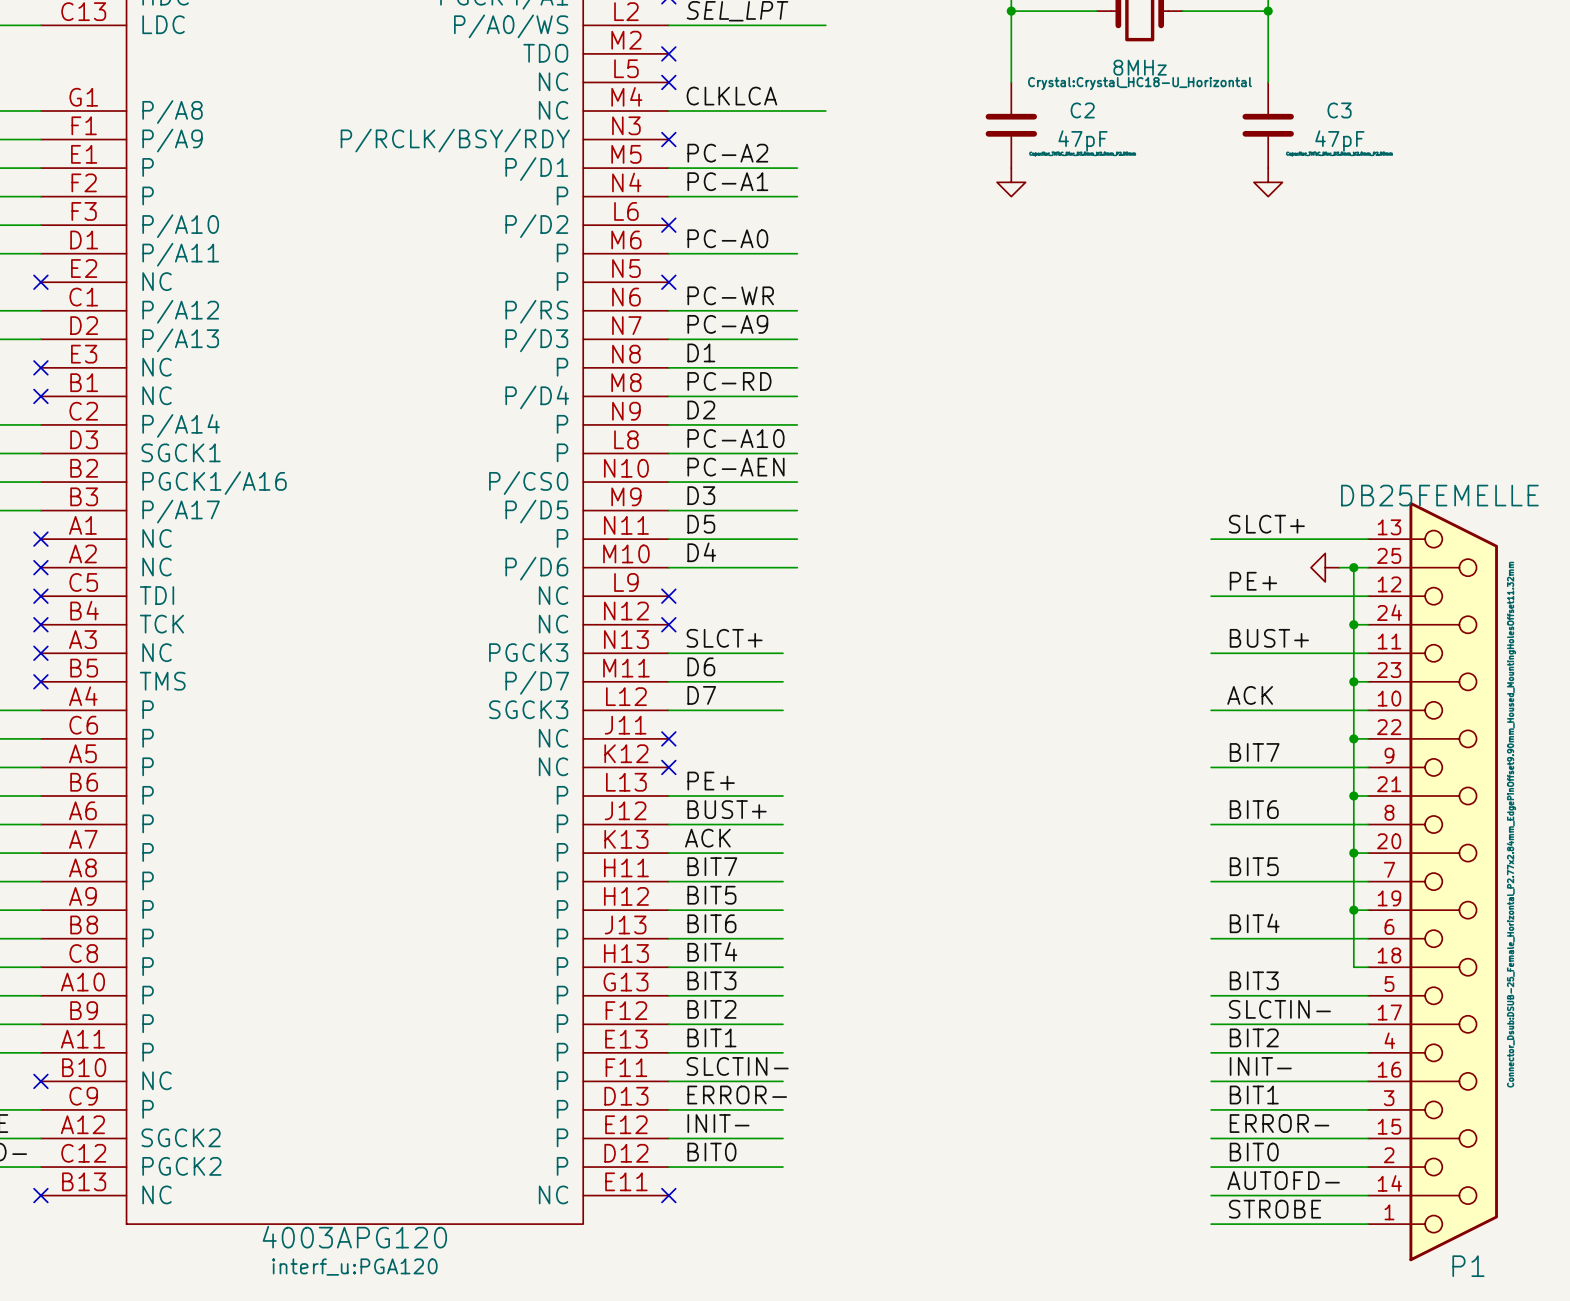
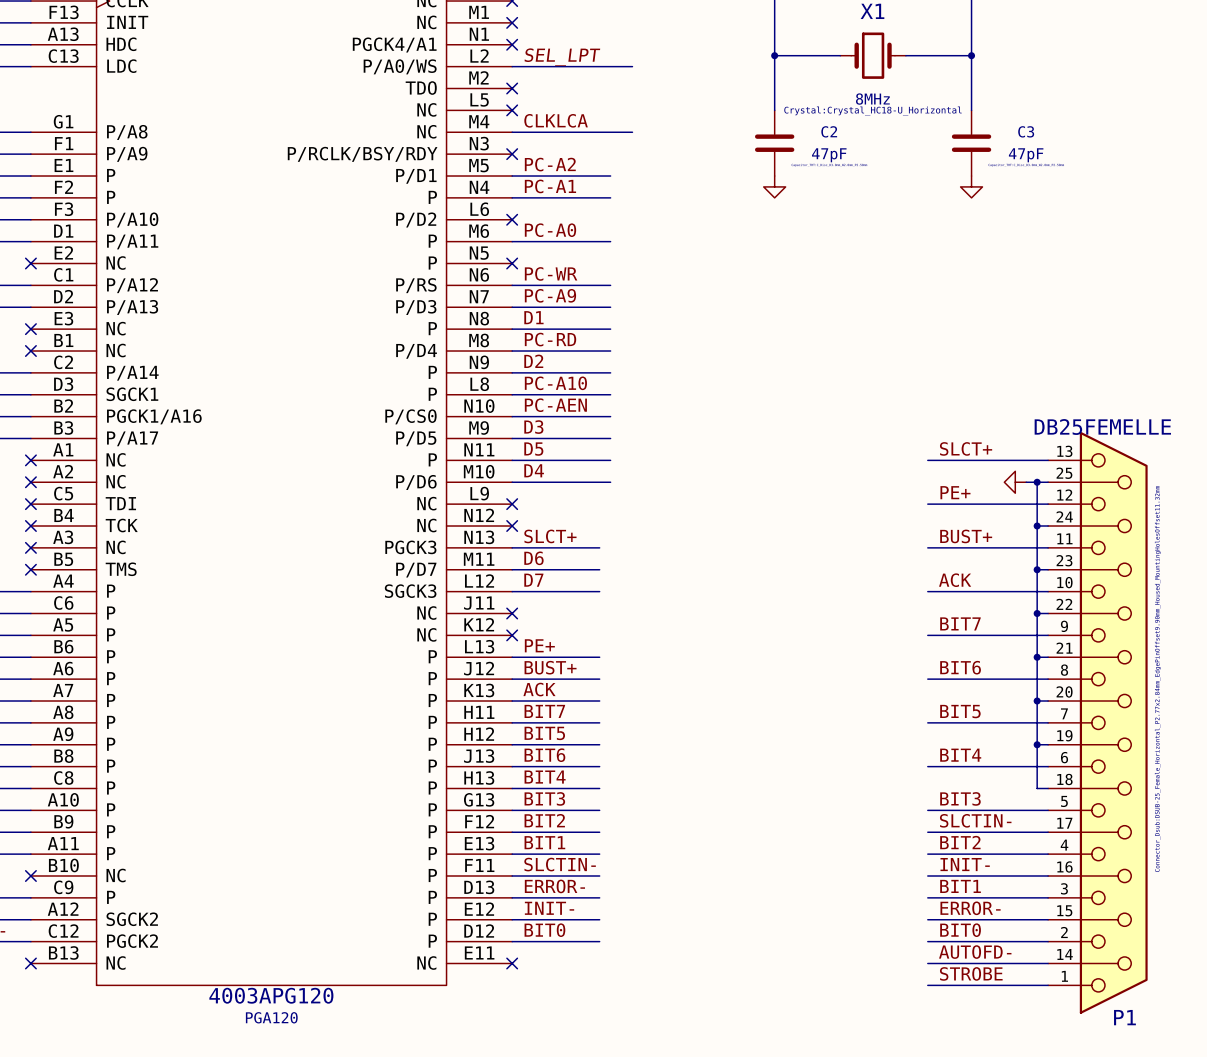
part text: interf_u:PGA120 (354, 1267) -> PGA120 (271, 1017)

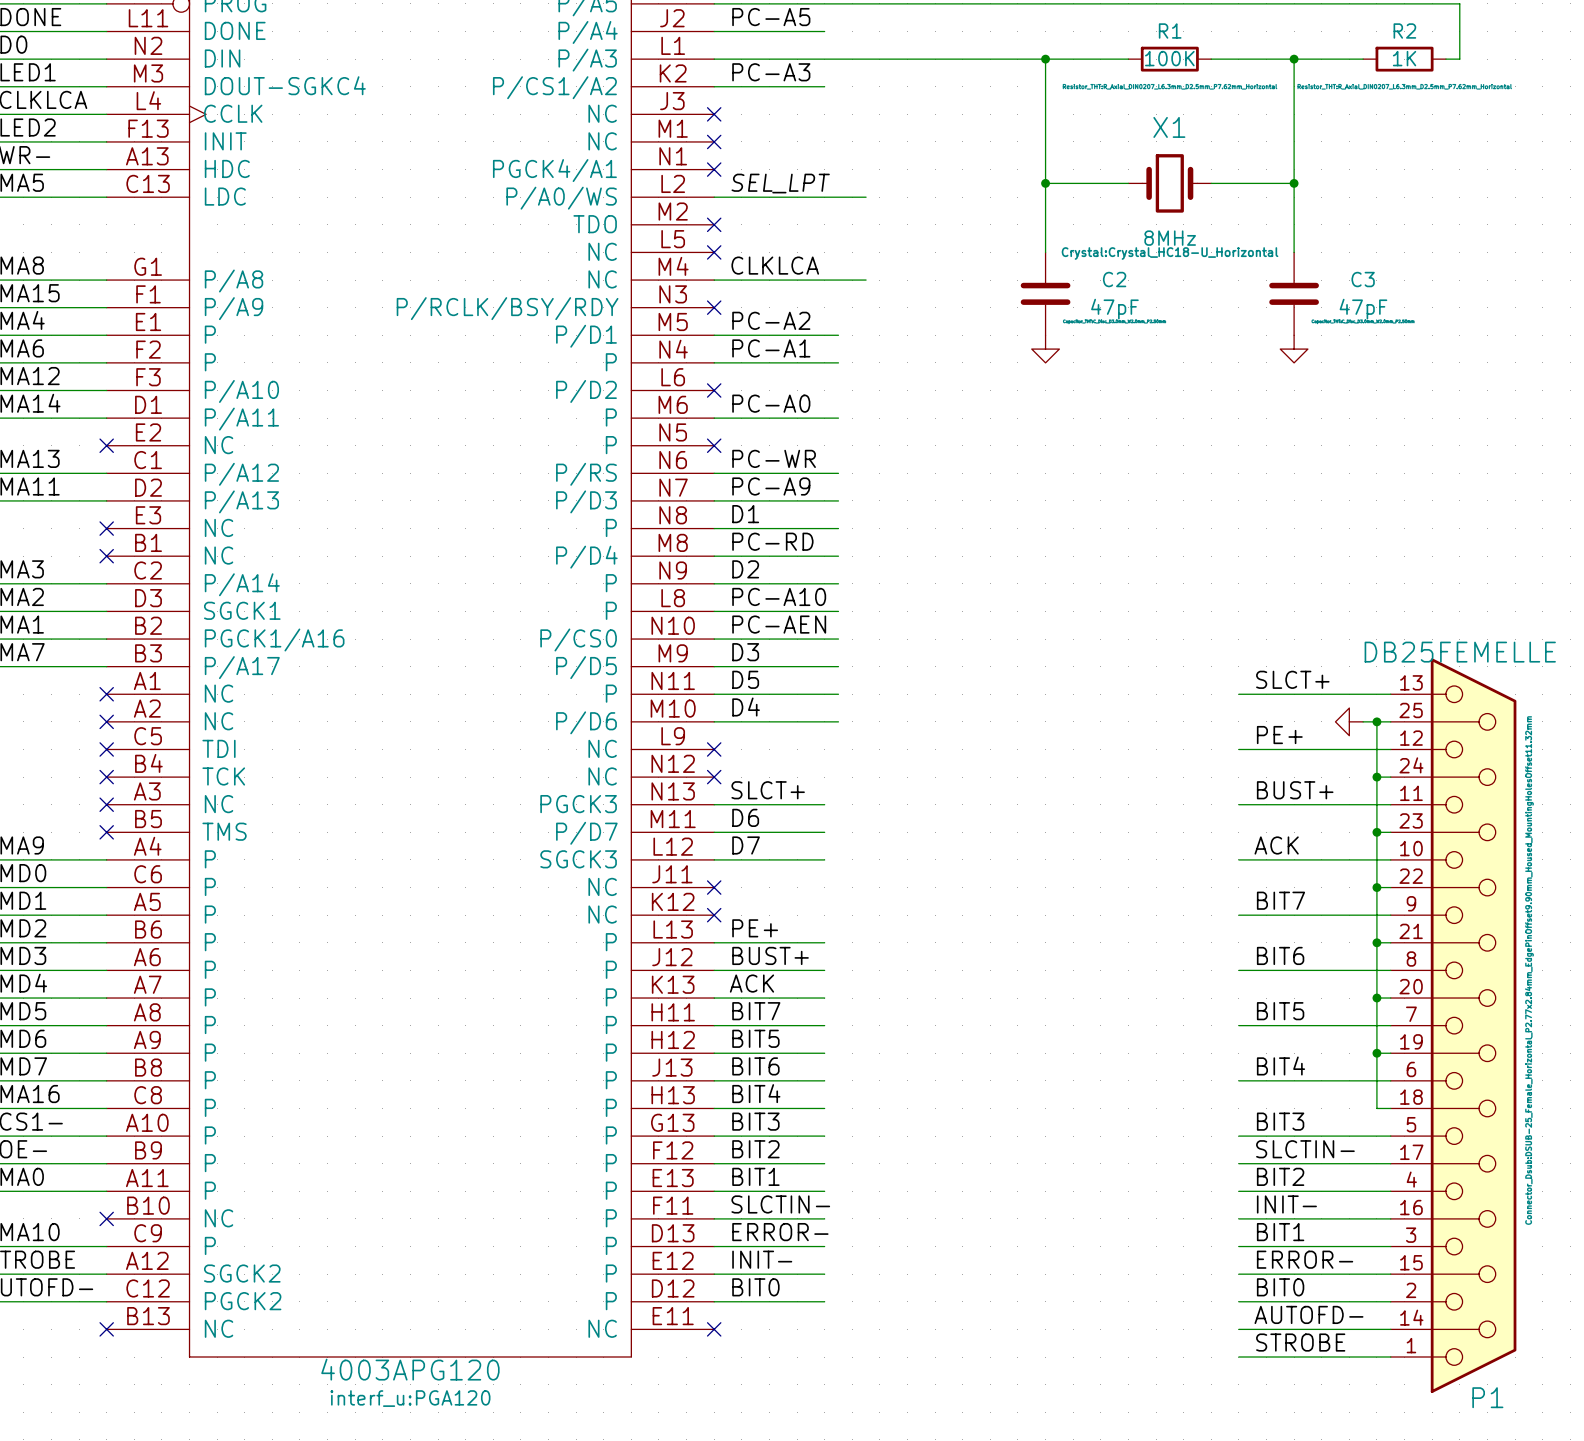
part text: PGA120 (271, 1017) -> interf_u:PGA120 (410, 1398)

